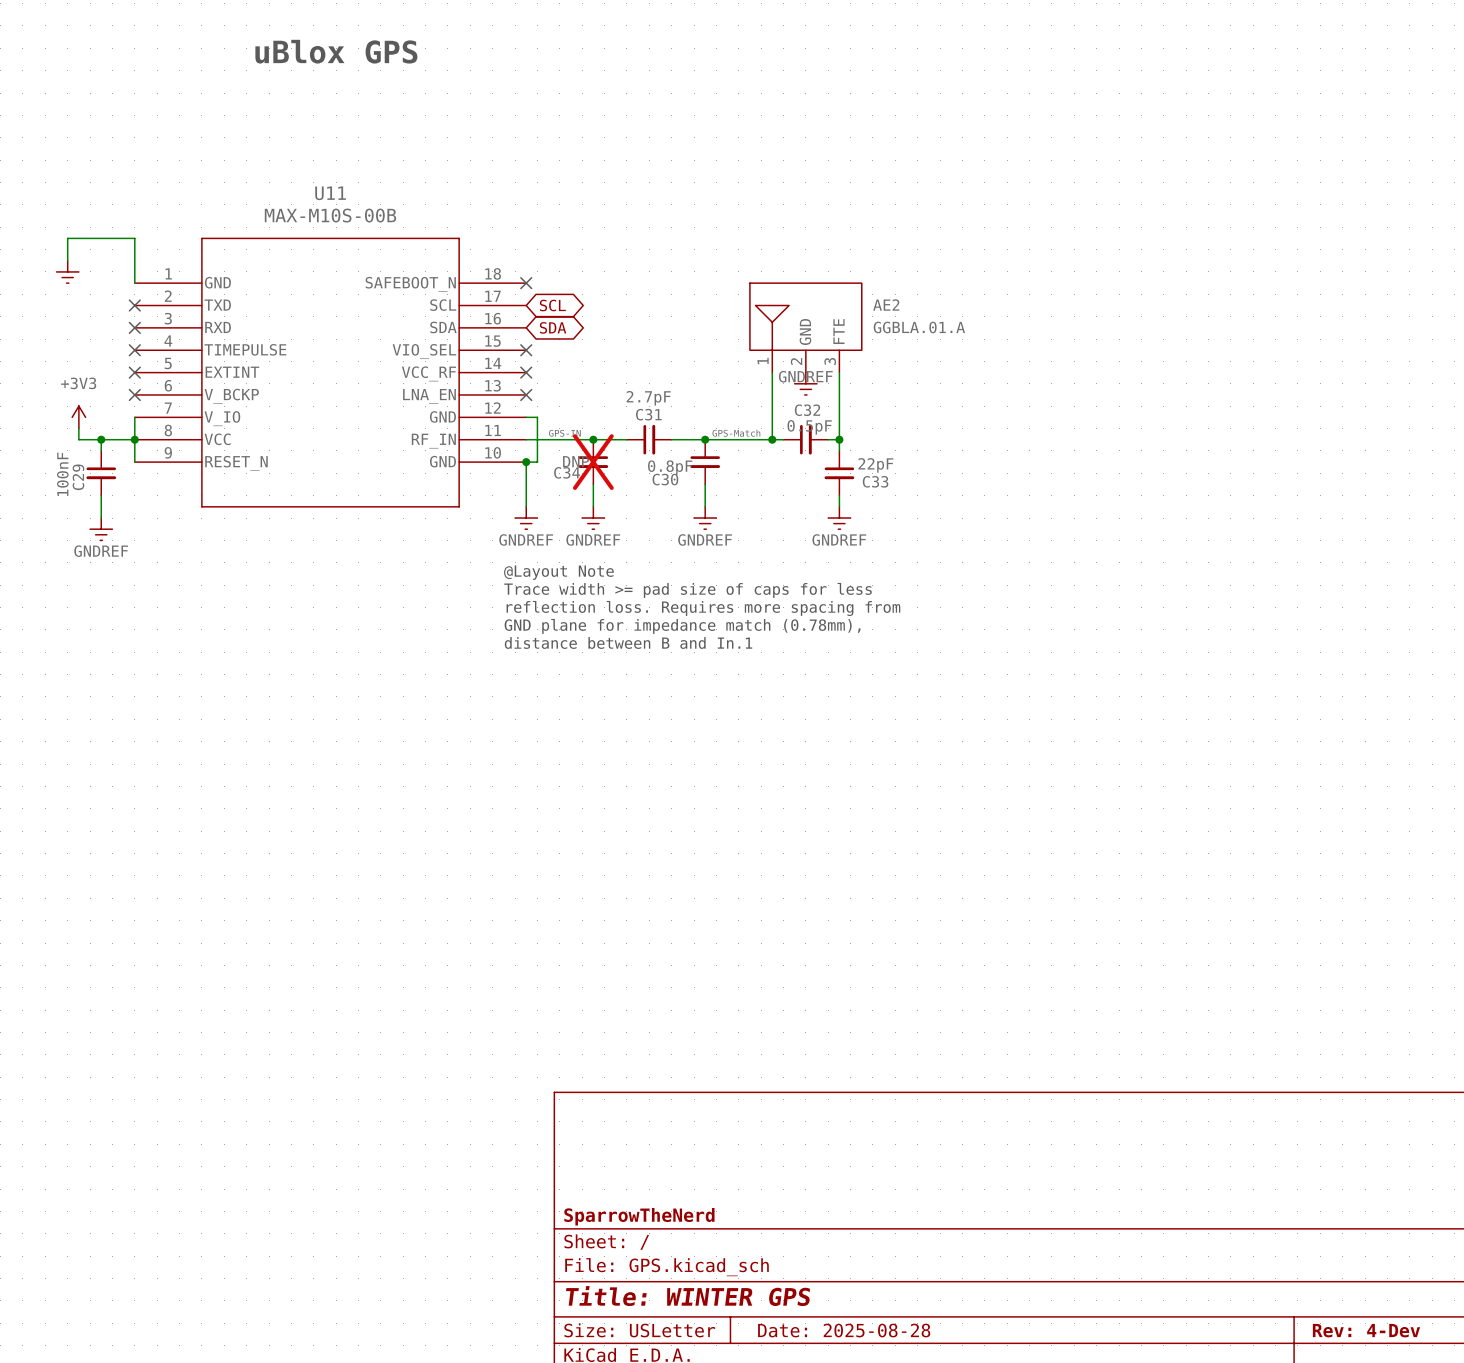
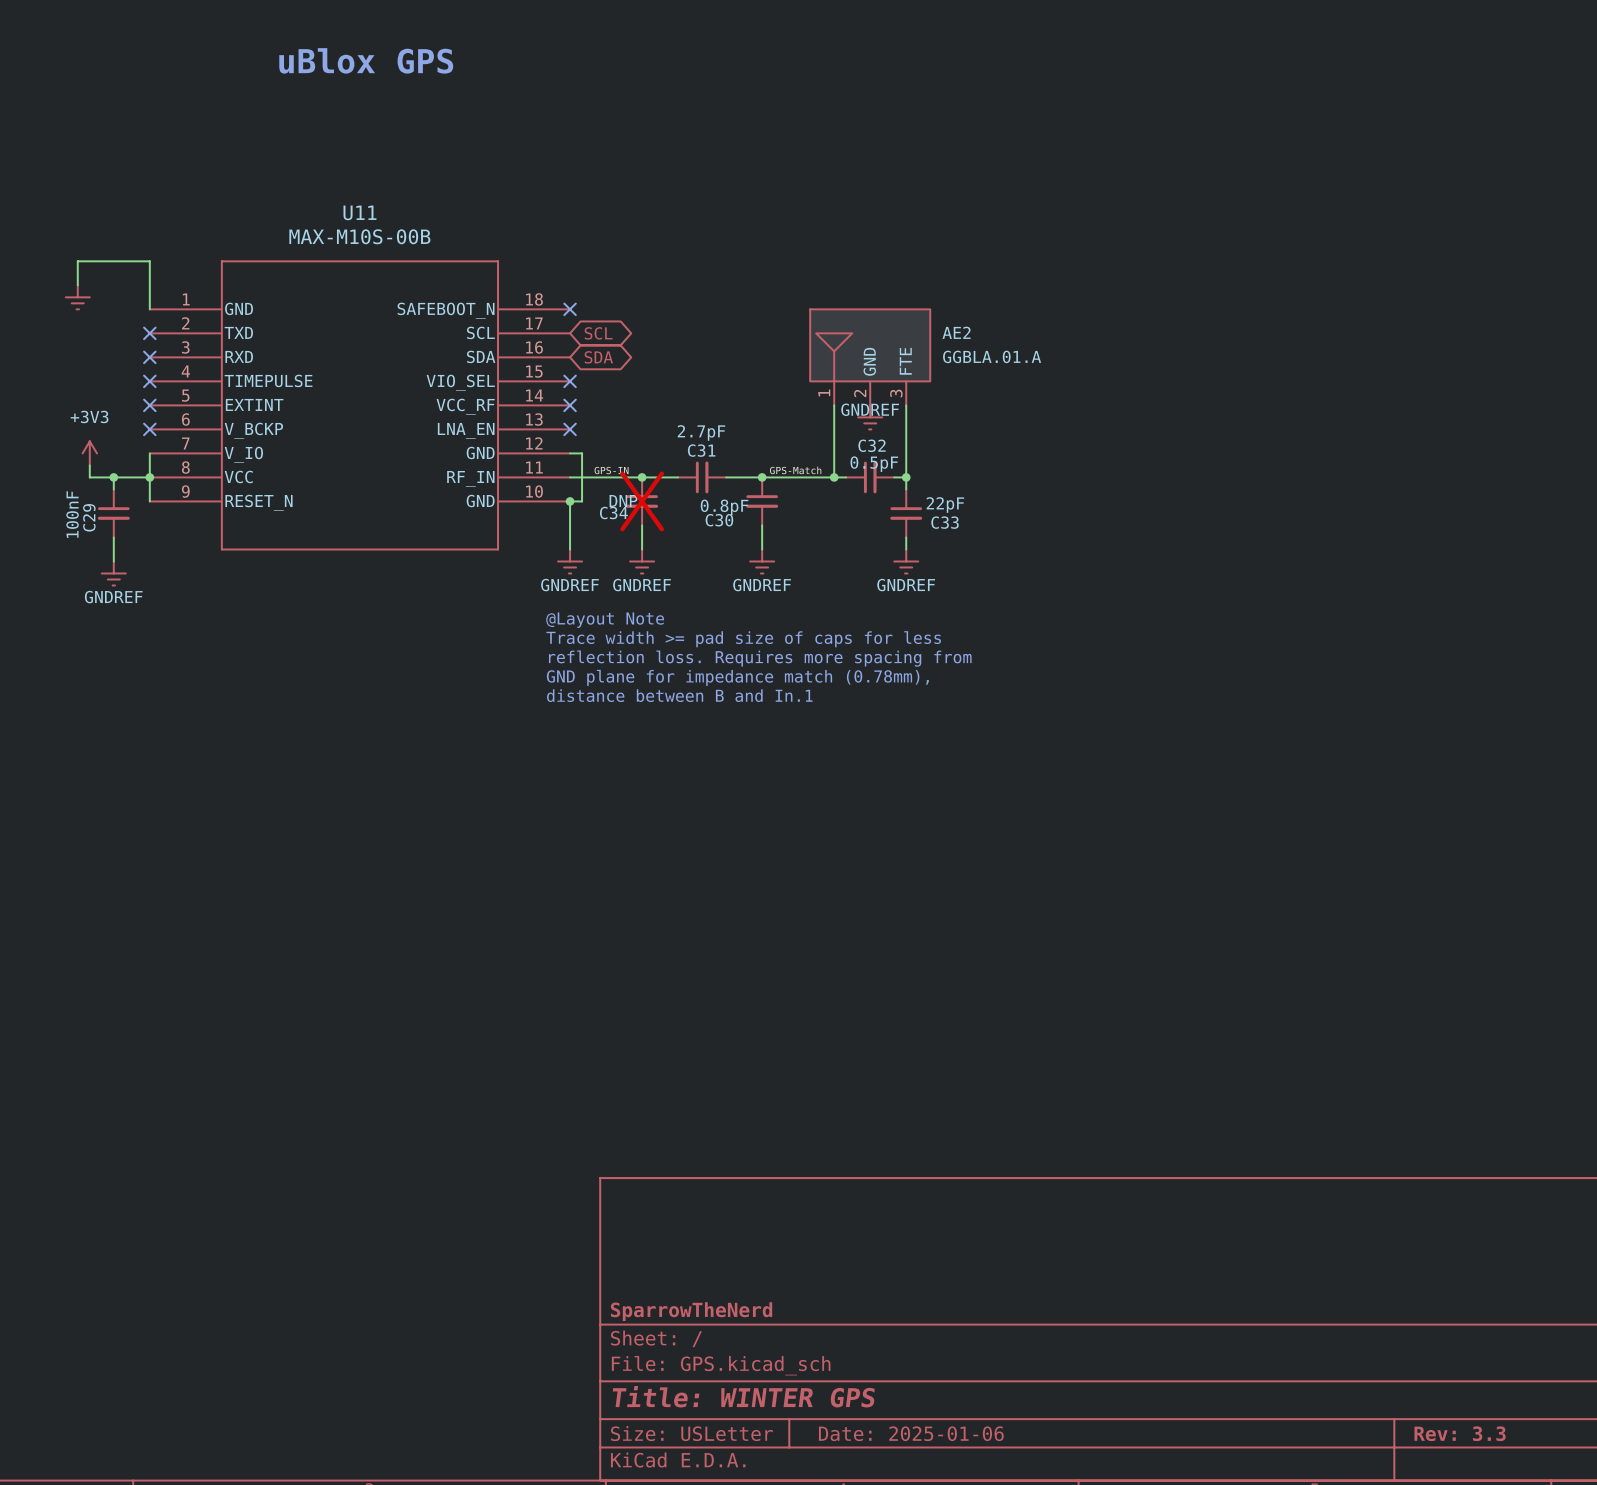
title block: Date: 2025-08-28 (844, 1330) -> Date: 2025-01-06 (911, 1433)
title block: Rev: 4-Dev (1366, 1330) -> Rev: 3.3 (1460, 1433)

